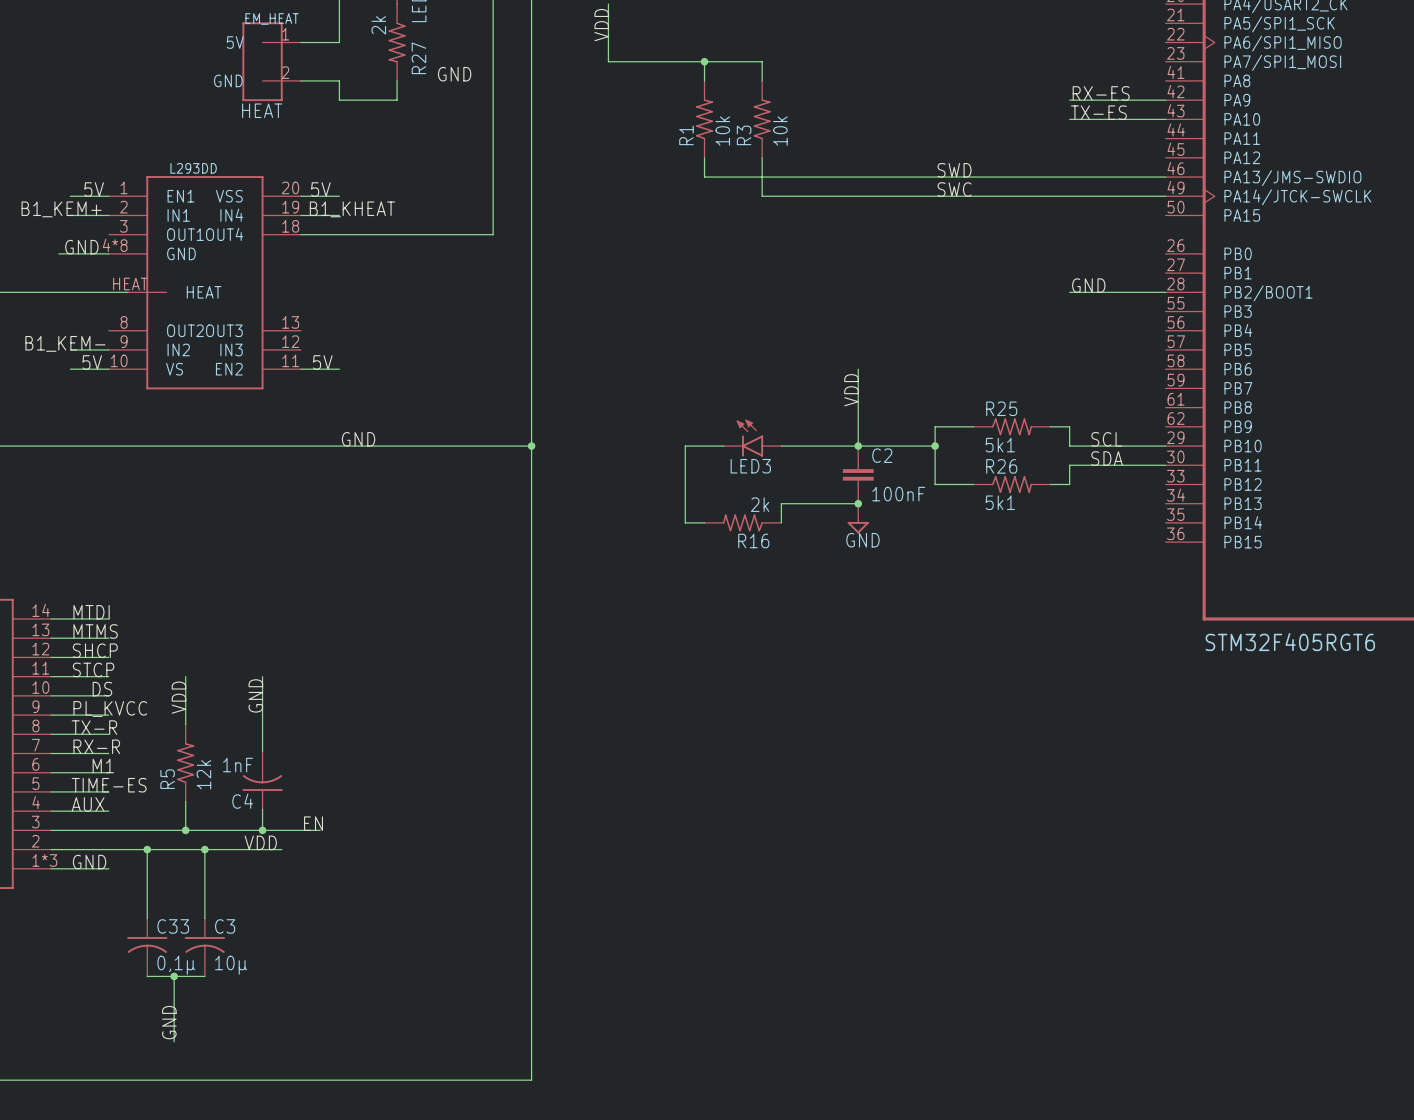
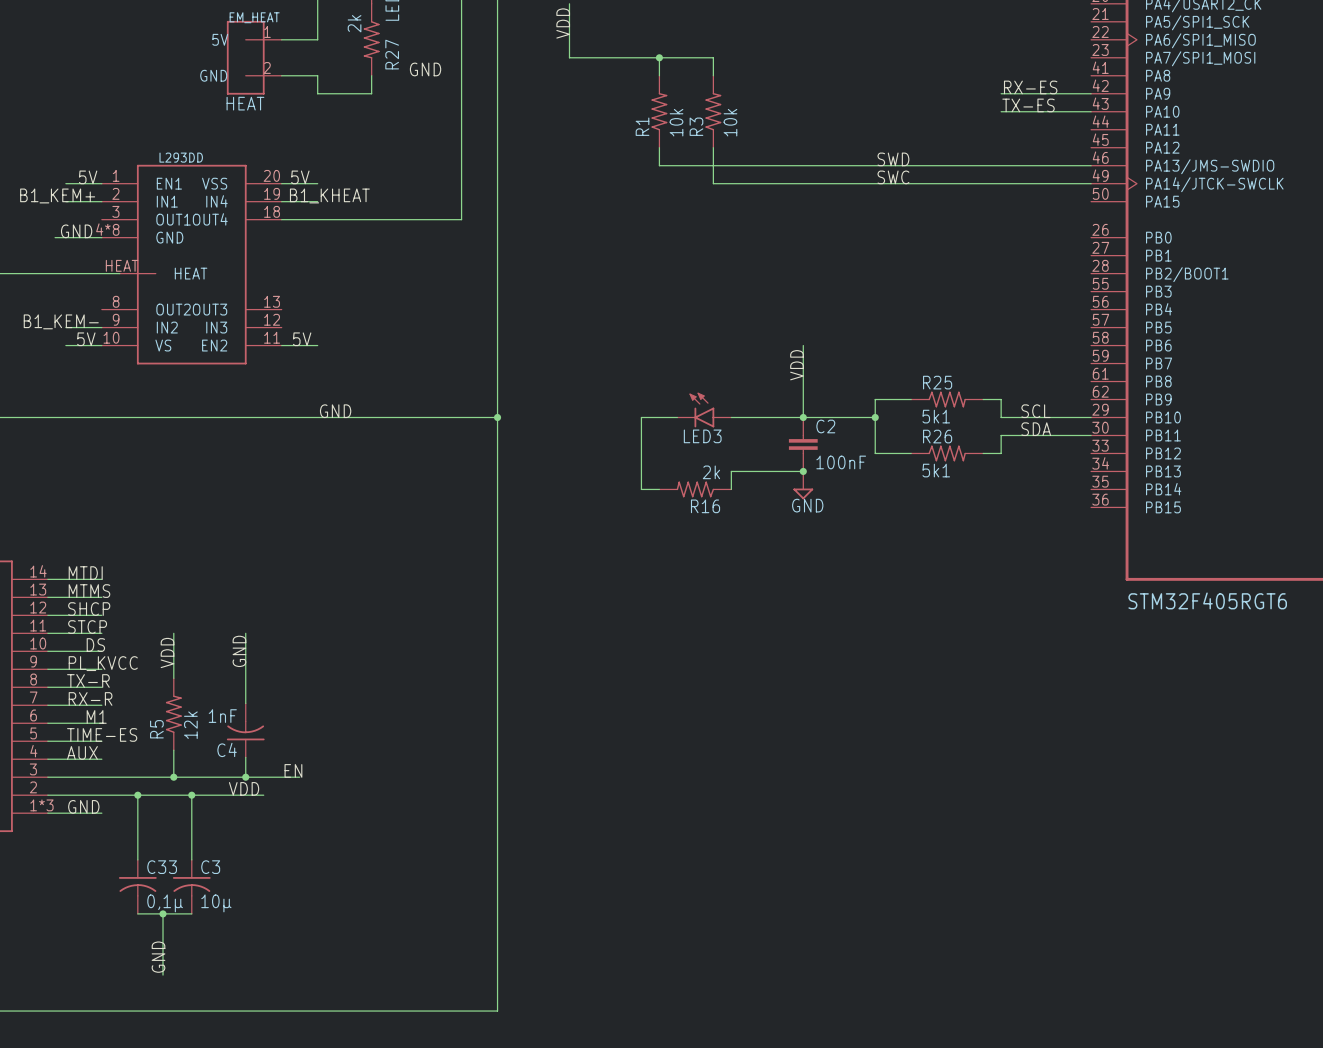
label: GND (1088, 285) -> none
wire: (1069, 292) (1165, 292) -> none

